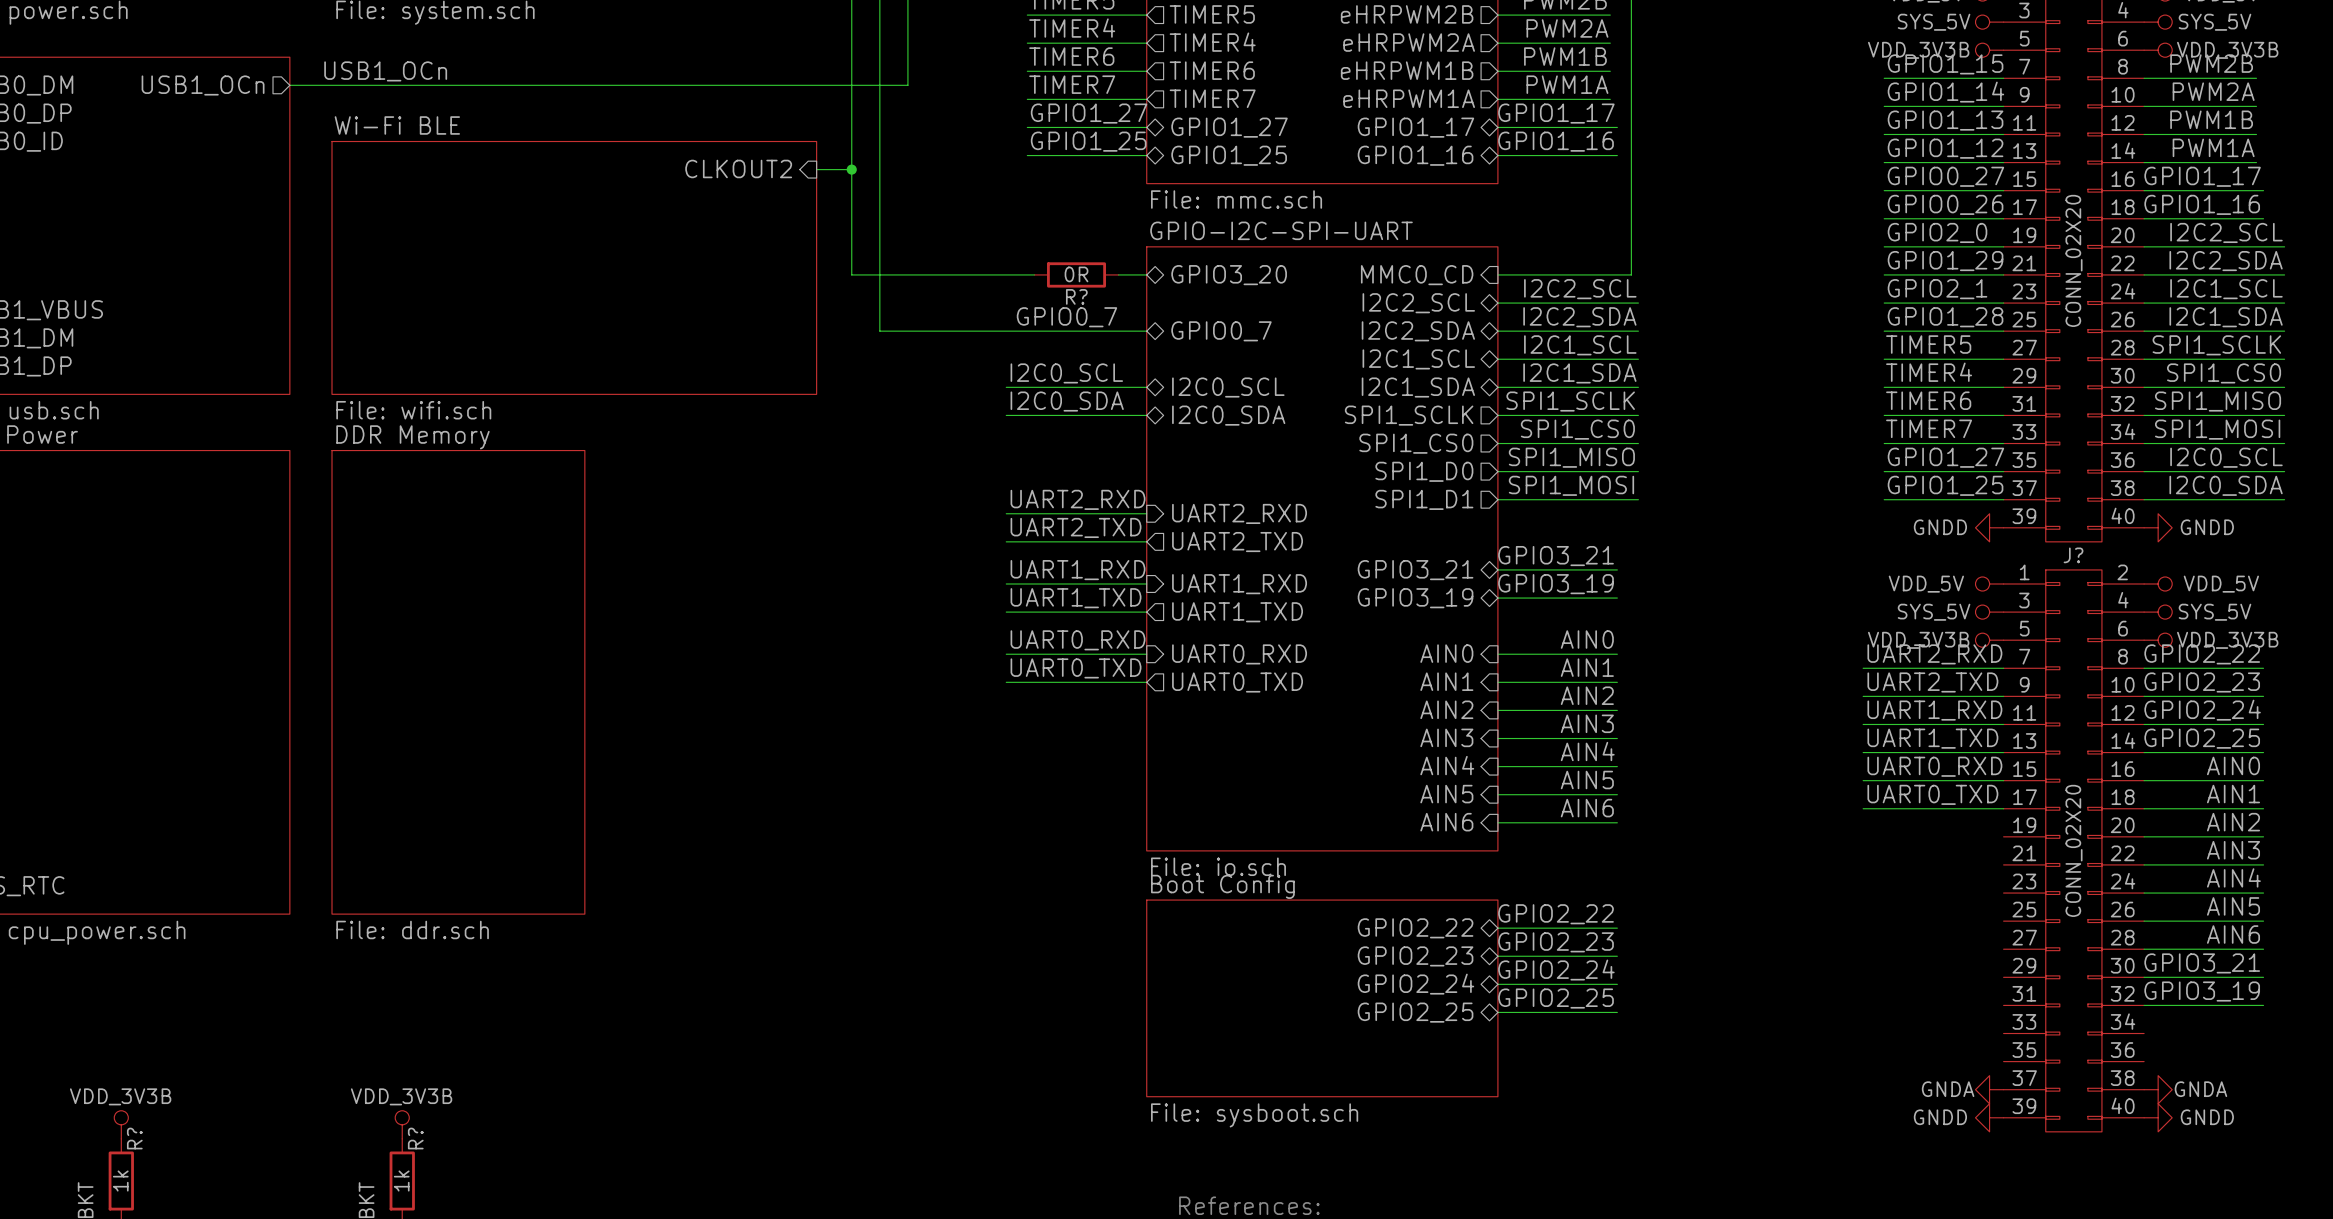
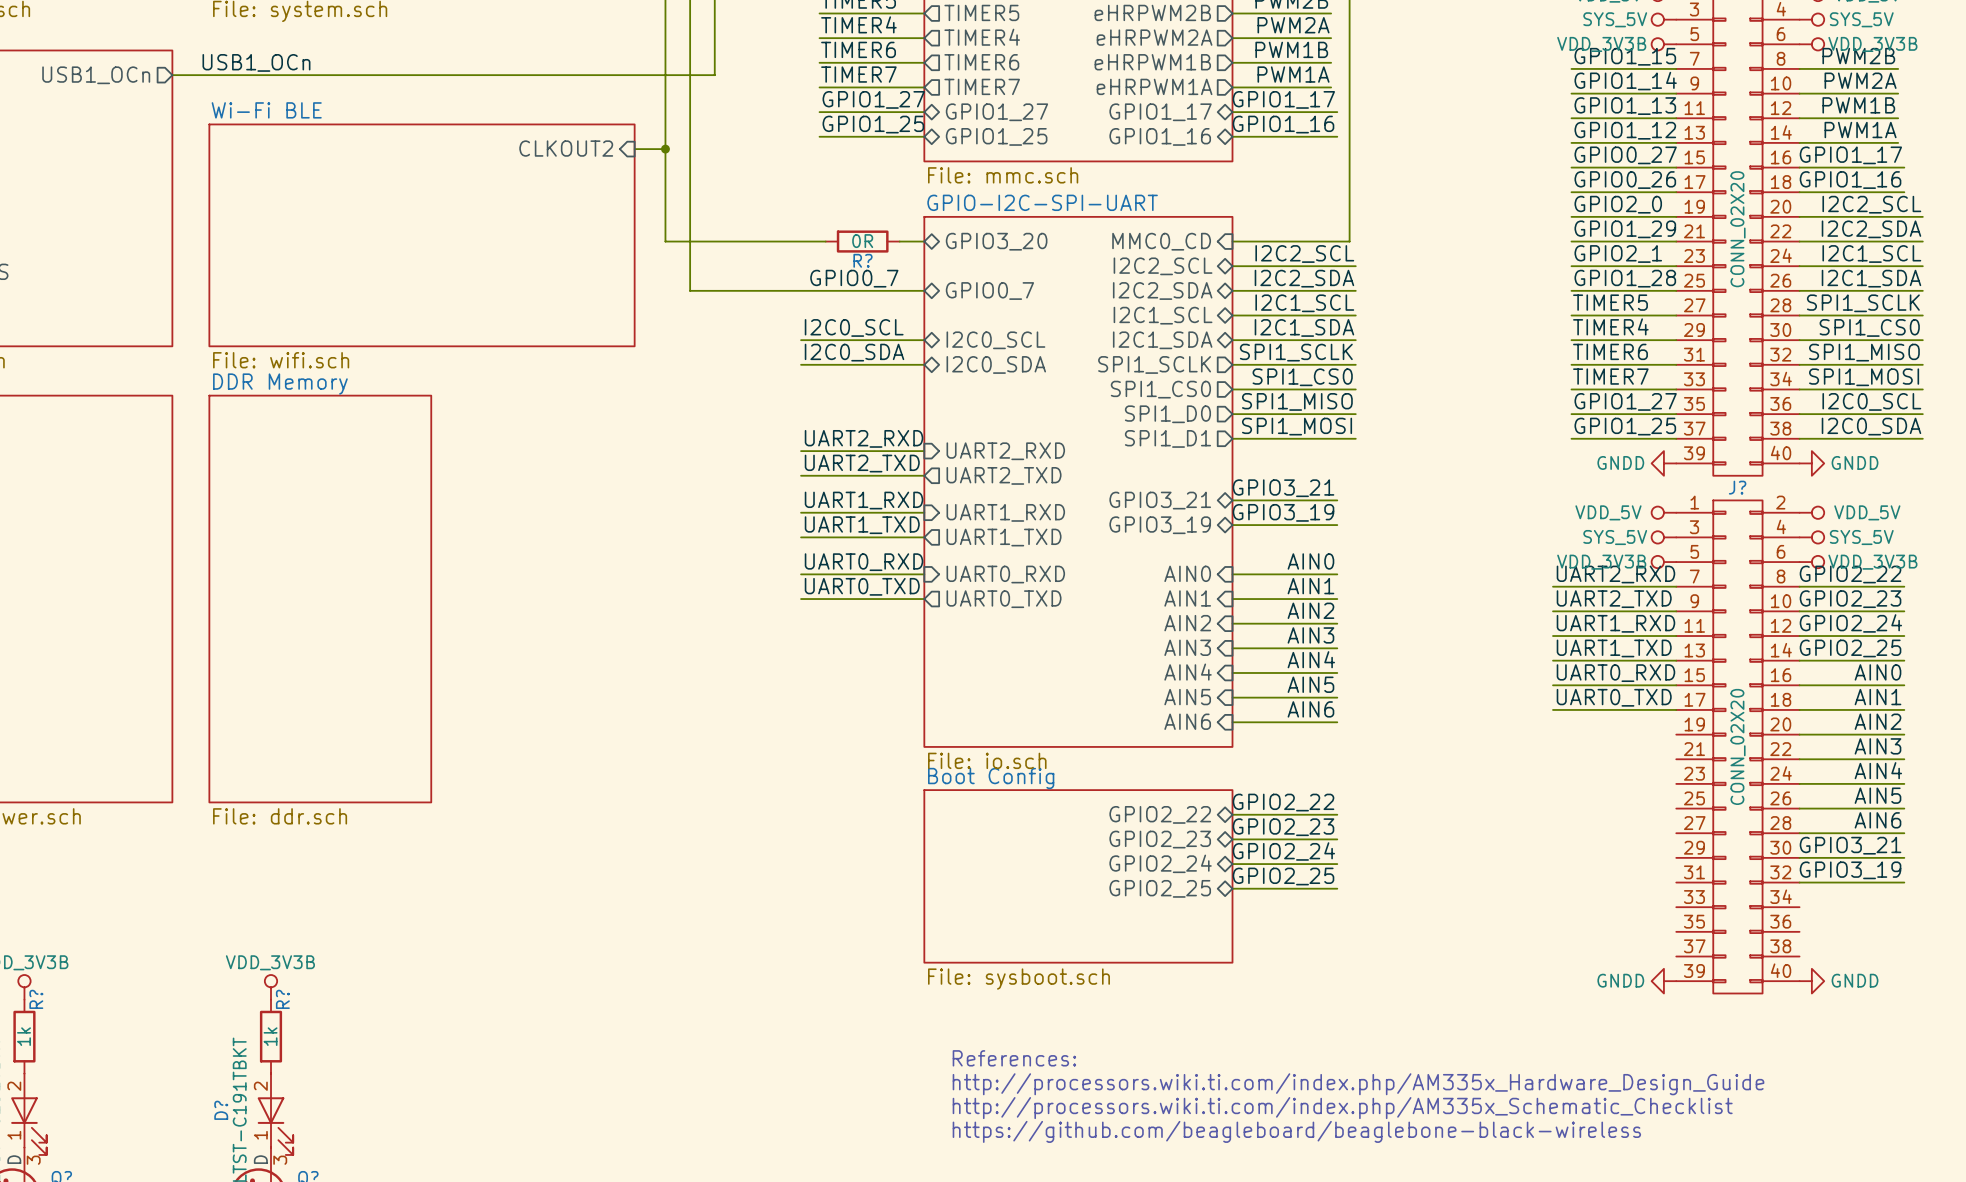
power symbol: GNDA (1989, 1089) -> none
power symbol: GNDA (2158, 1089) -> none

